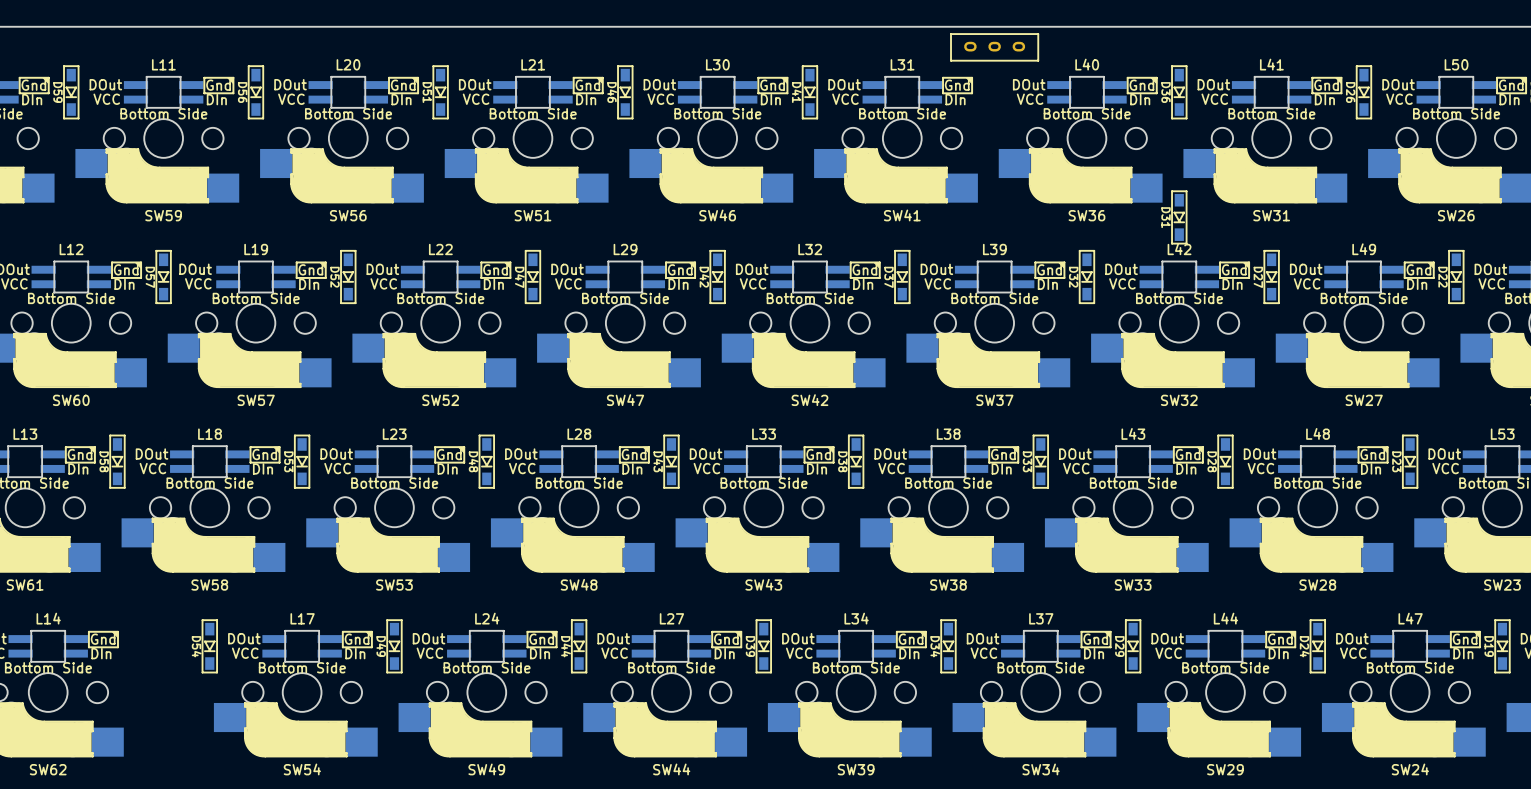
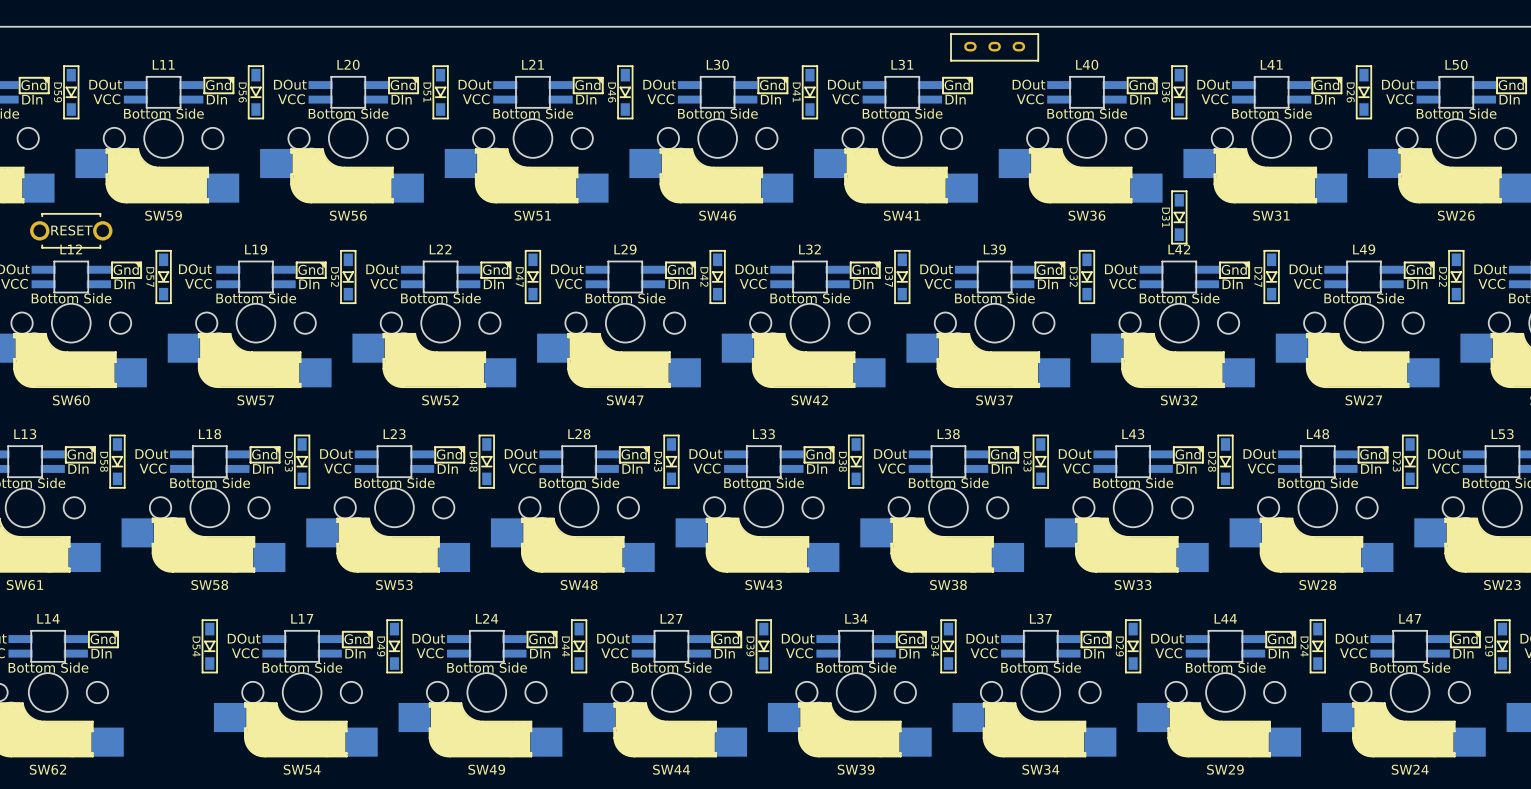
part: none -> (71, 230)

